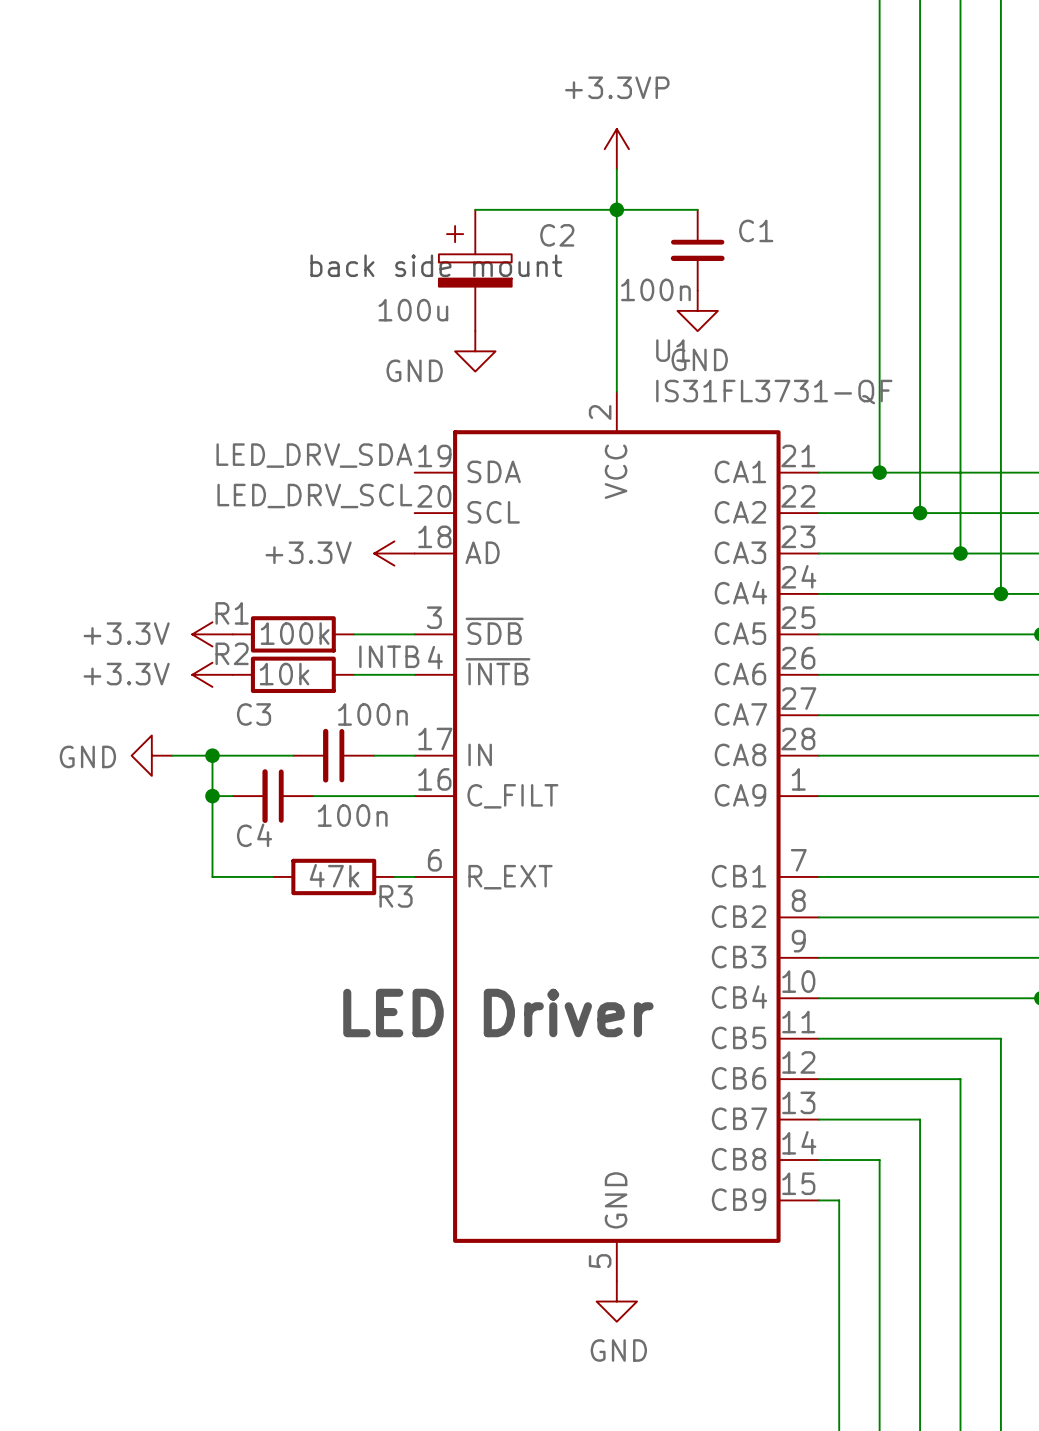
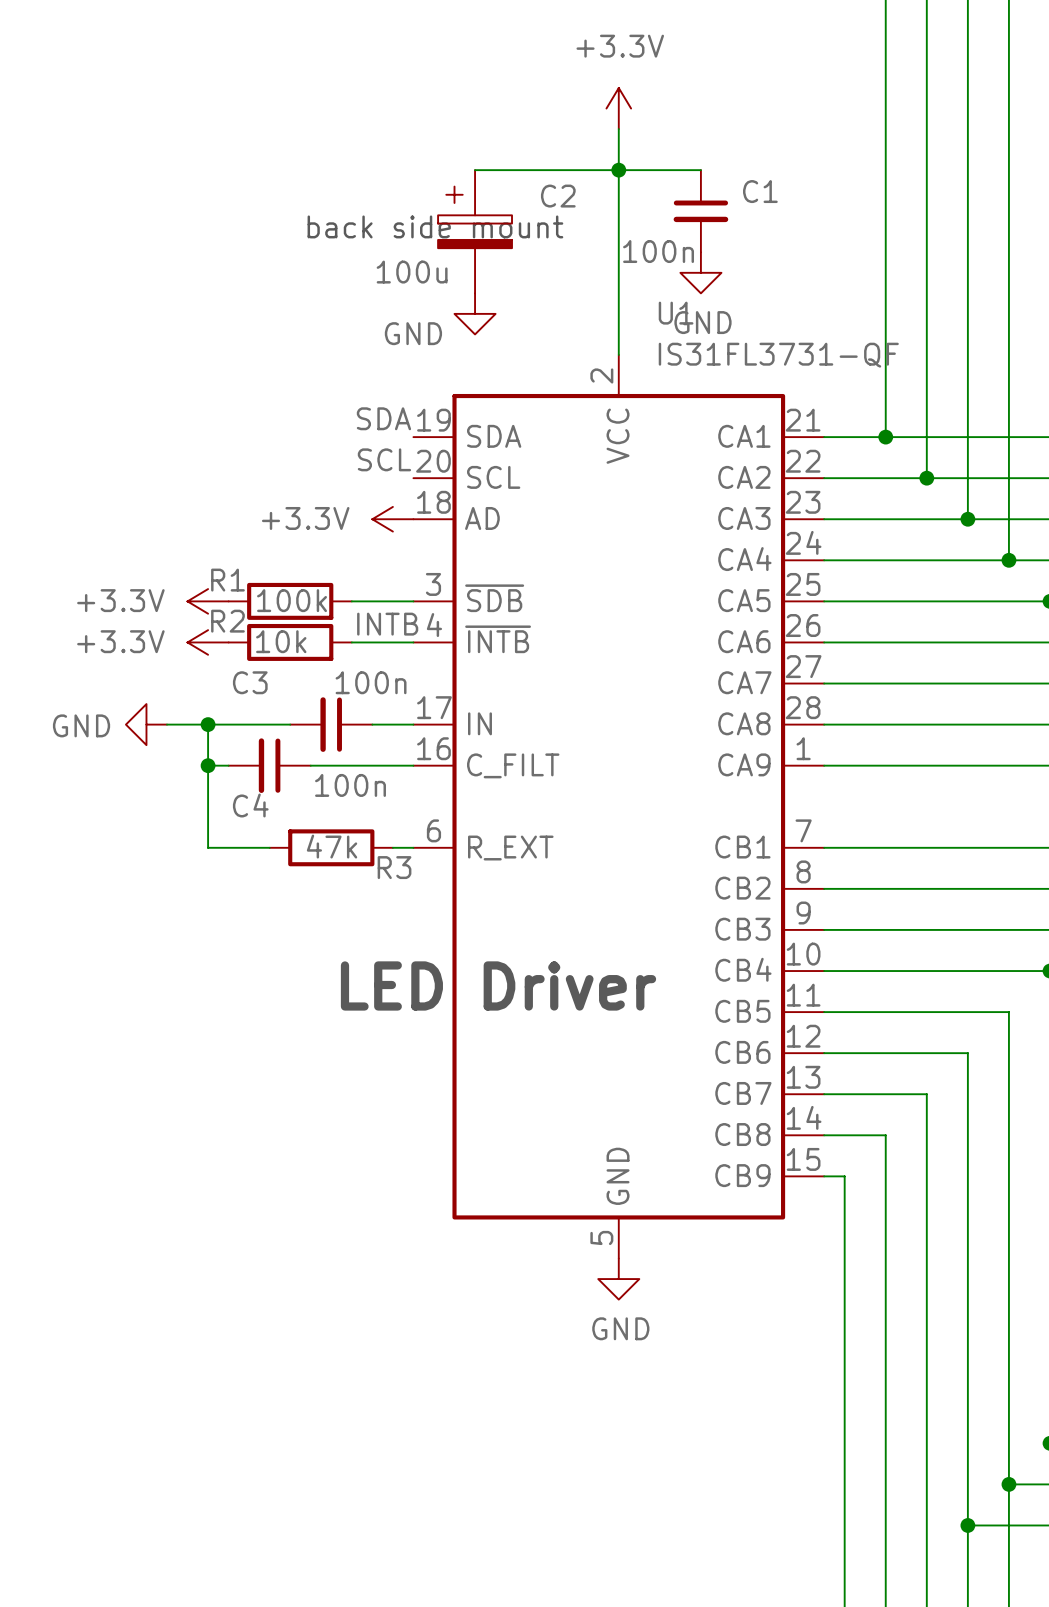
power symbol: +3.3VP (616, 149) -> +3.3V (618, 108)
label: LED_DRV_SDA (314, 455) -> SDA (383, 418)
label: LED_DRV_SCL (314, 496) -> SCL (384, 459)

